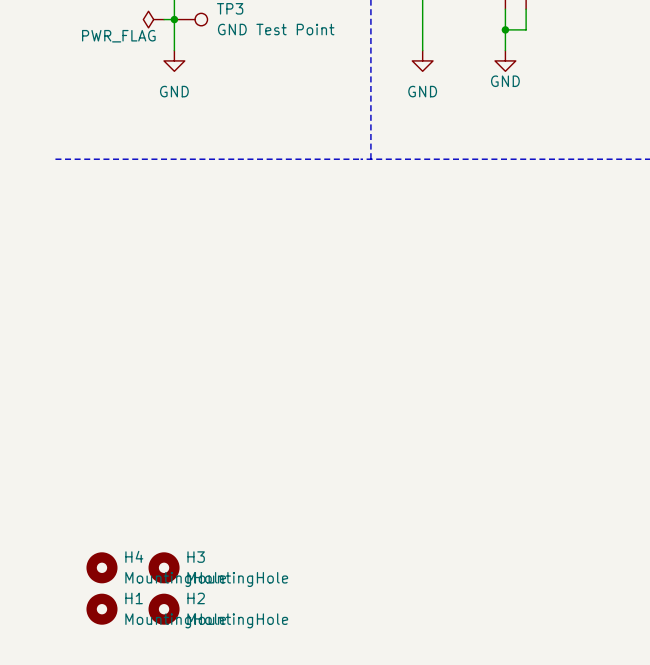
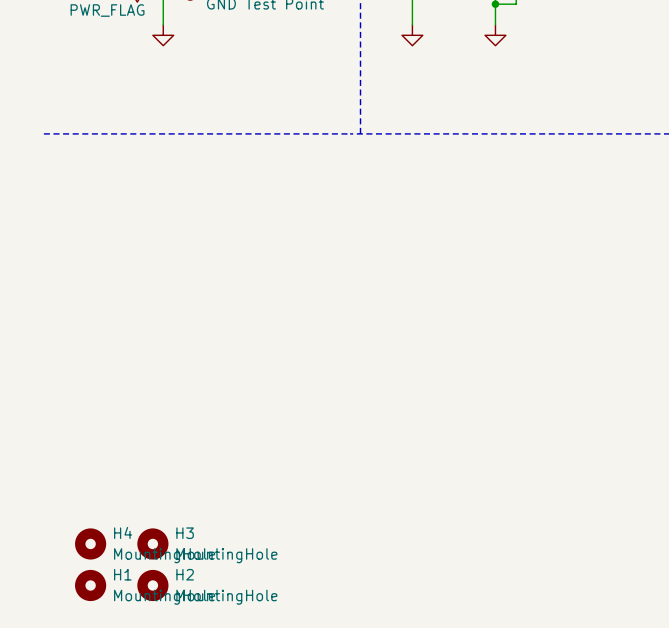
power symbol text: GND (505, 81) -> none
power symbol text: GND (174, 91) -> none
power symbol text: GND (422, 91) -> none

